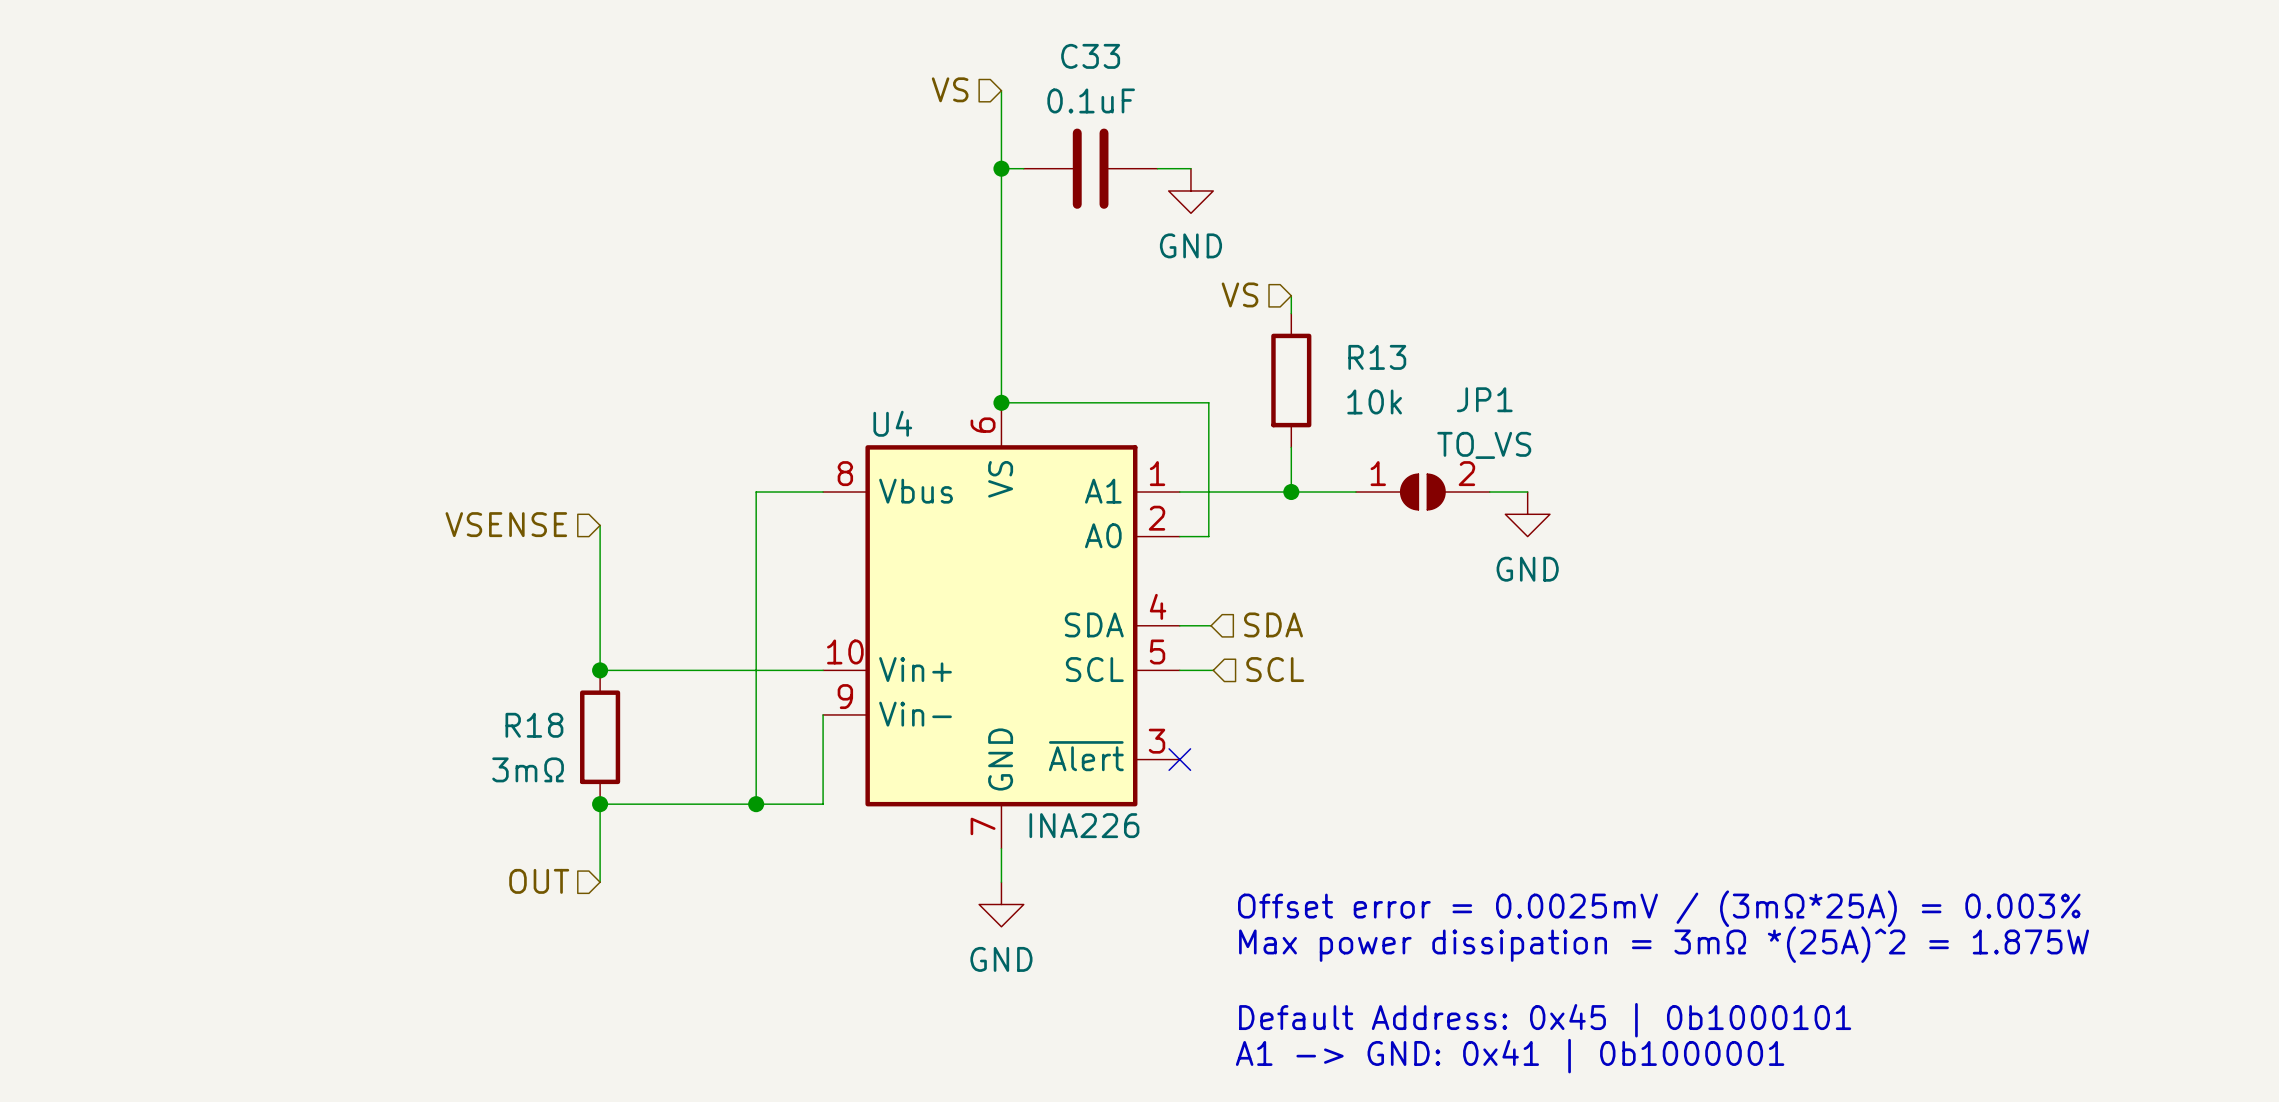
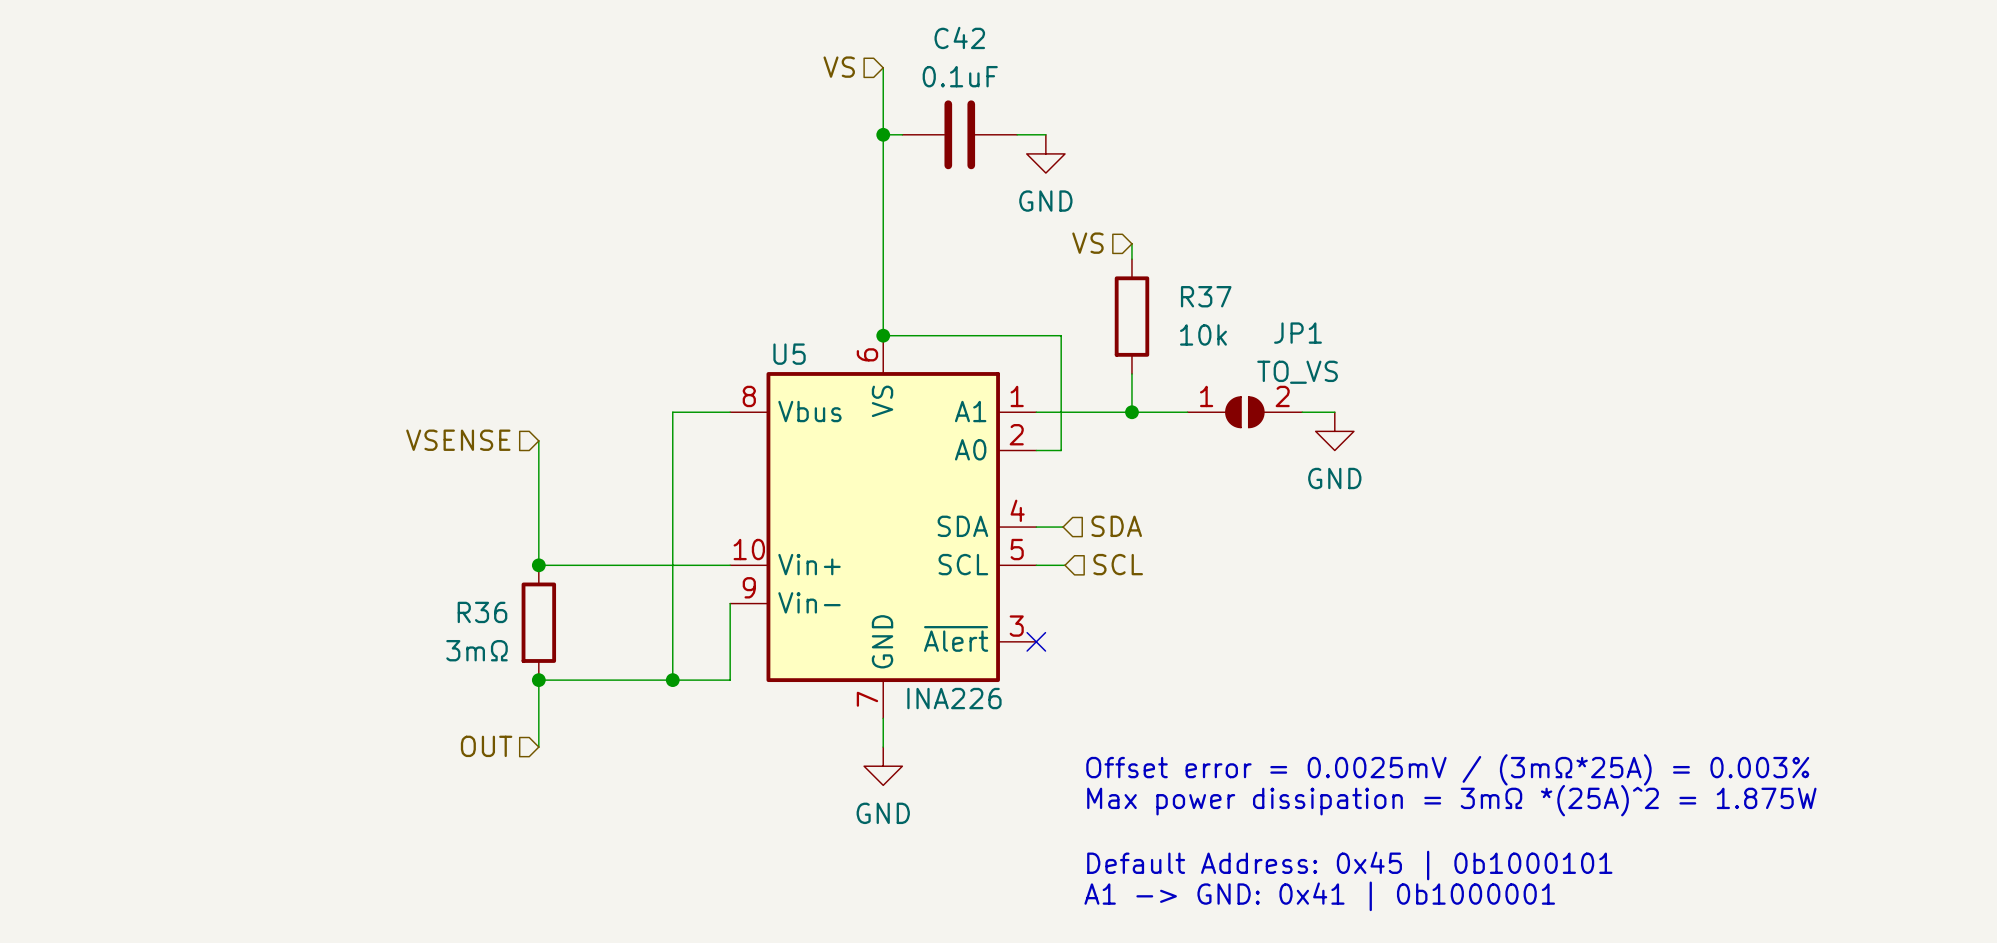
C33 name: C33 (1090, 56) -> C42 (959, 37)
R13 name: R13 (1377, 357) -> R37 (1206, 296)
U4 name: U4 (892, 423) -> U5 (789, 354)
R18 name: R18 (534, 725) -> R36 (482, 612)

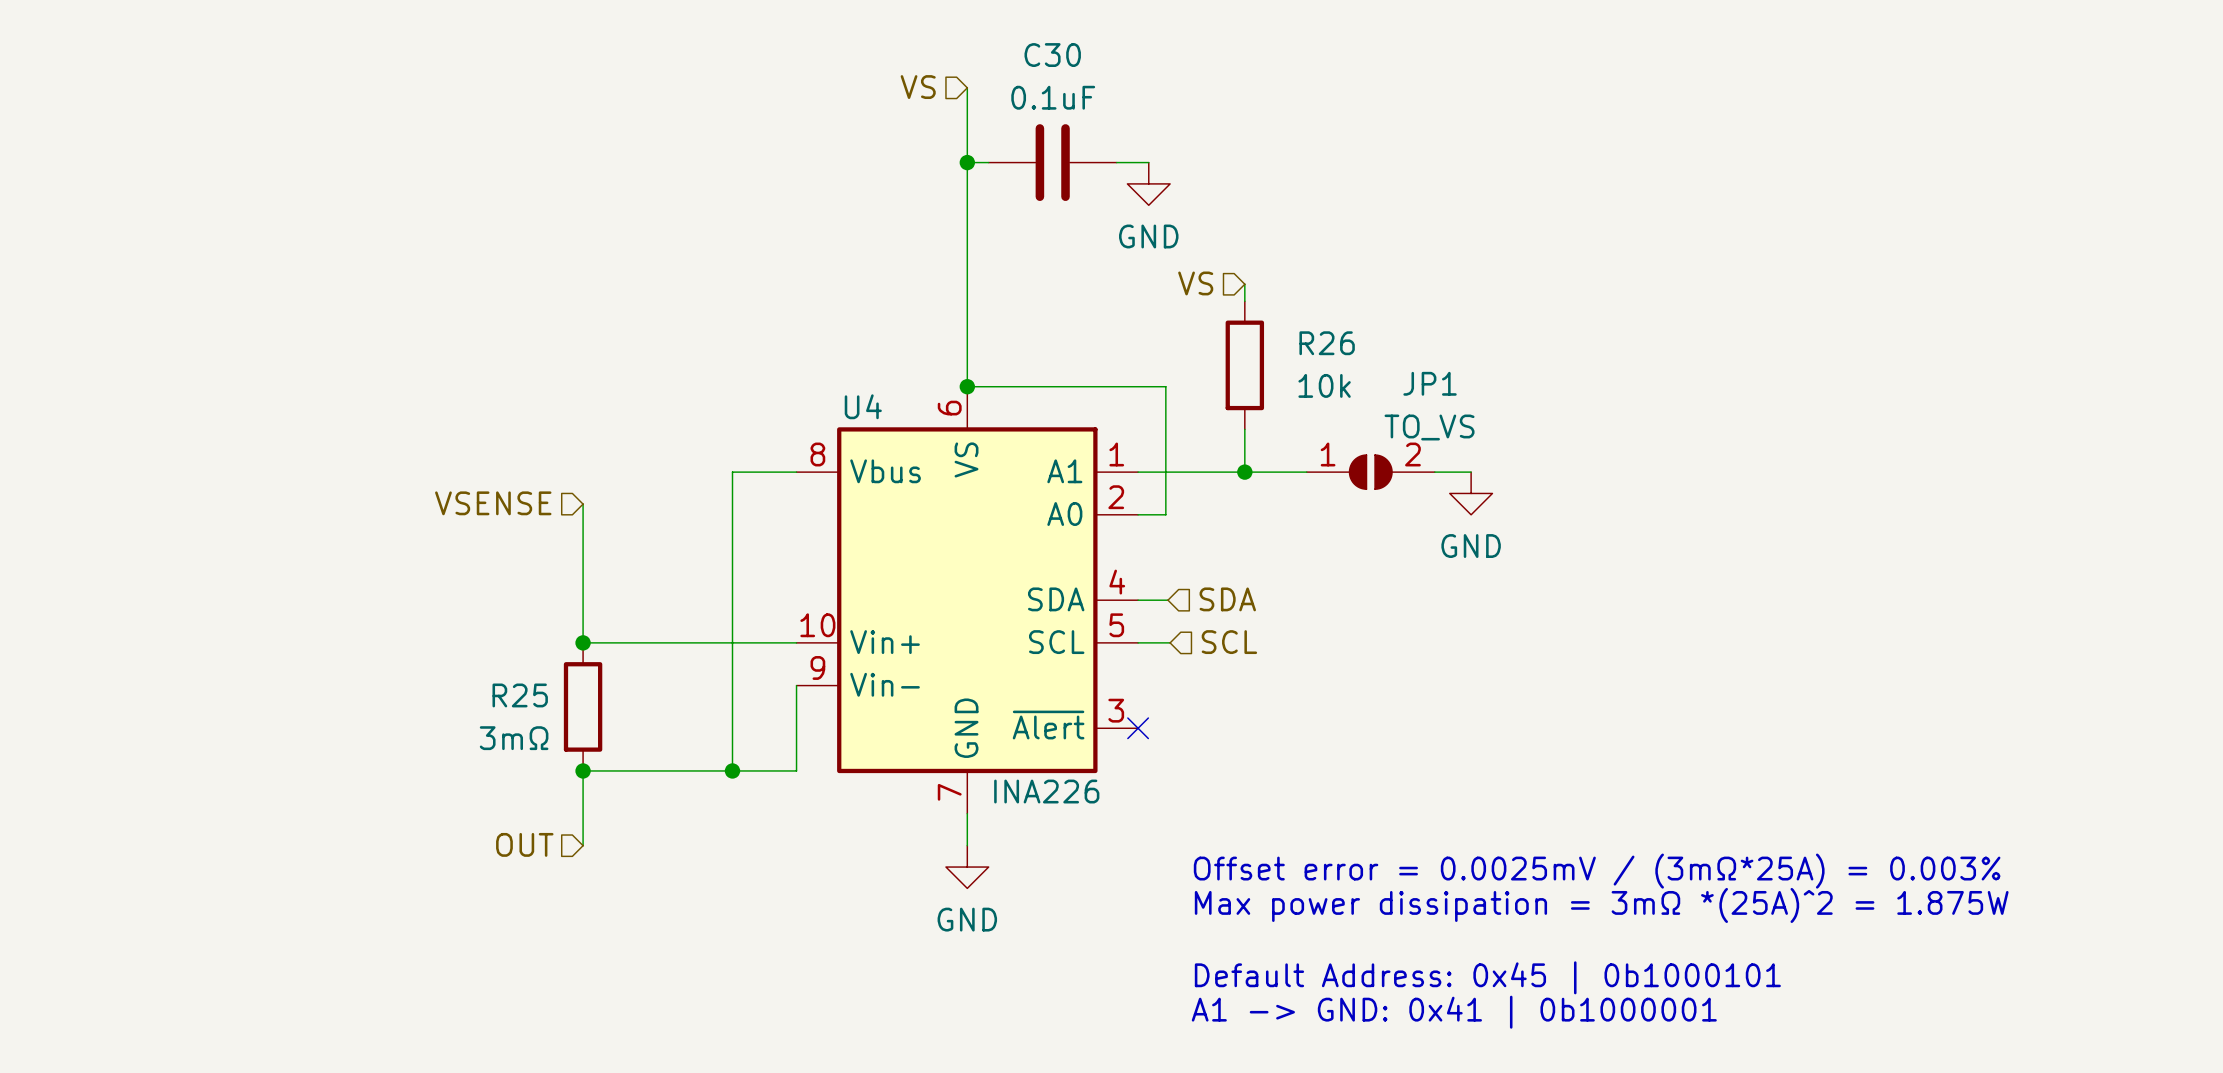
C42 name: C42 (959, 37) -> C30 (1052, 55)
R37 name: R37 (1206, 296) -> R26 (1327, 343)
U5 name: U5 (789, 354) -> U4 (863, 406)
R36 name: R36 (482, 612) -> R25 (520, 695)

